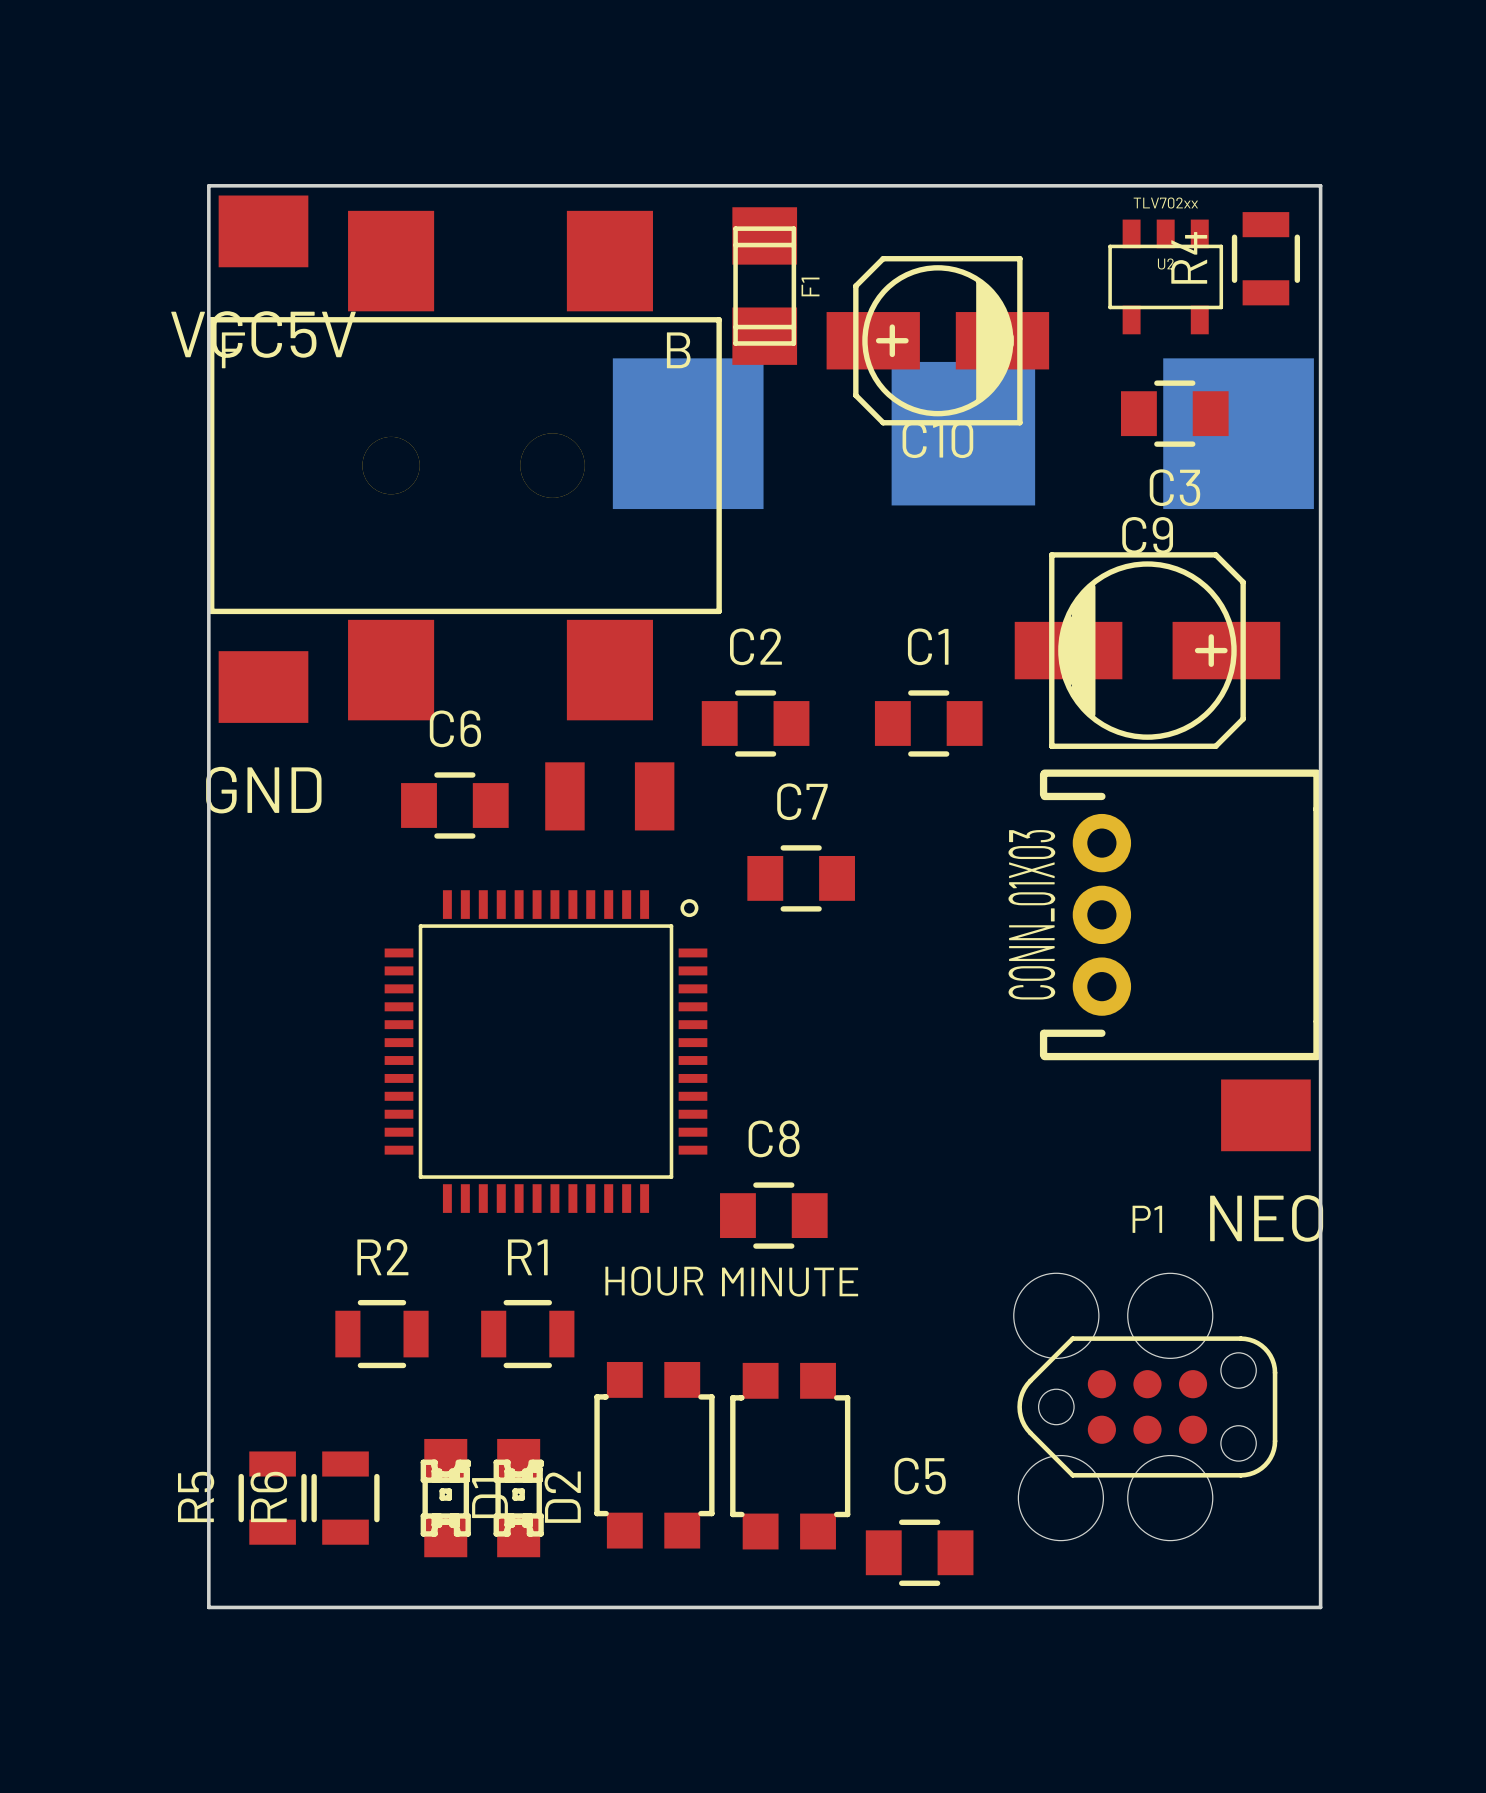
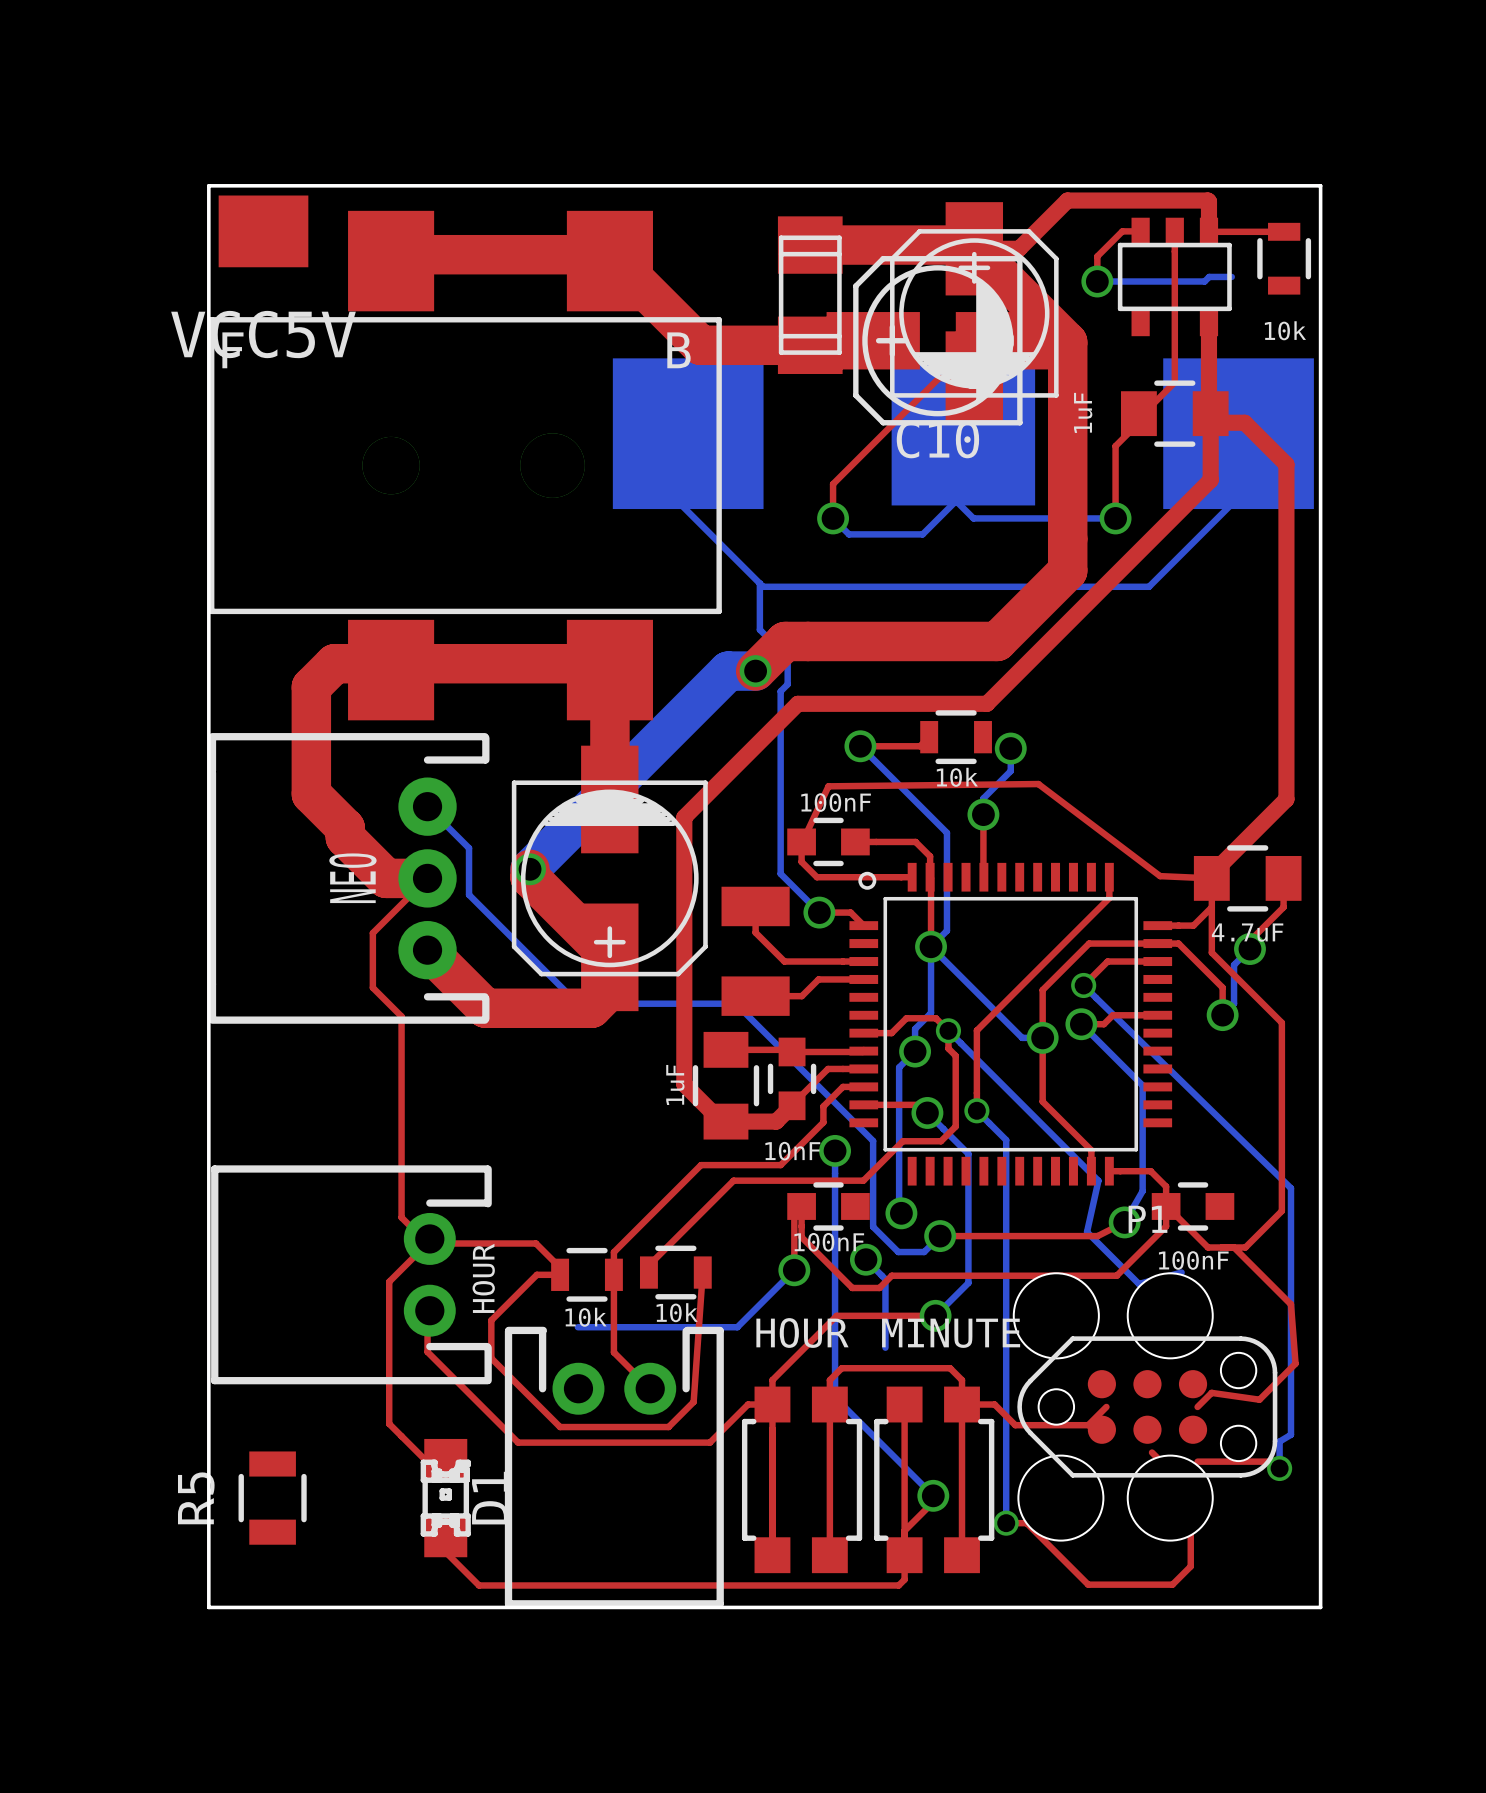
top track: none -> (1140, 231) (1122, 231) (1097, 256) (1097, 281)
top track: none -> (1174, 231) (1174, 382) (1138, 418) (1138, 422) (1115, 446) (1115, 518)
top track: none -> (1208, 231) (1207, 200) (1067, 200) (1019, 248) (974, 248)
top track: none -> (1209, 231) (1284, 231)
top track: none -> (810, 245) (970, 245) (1067, 342) (1067, 570) (997, 641) (785, 641) (755, 671)
top track: none -> (391, 254) (609, 254) (700, 345) (810, 345)
R4: (1265, 258) -> none
part: none -> 10k (1284, 258)
U2: TLV702xx (1165, 276) -> none
part: none -> (1174, 276)
bottom track: none -> (1231, 276) (1209, 276) (1204, 281) (1097, 281)
via: none -> (1097, 281)
F1: (764, 286) -> none
part: none -> (810, 295)
part: none -> (974, 313)
top track: none -> (1208, 322) (1208, 421) (1210, 422)
top track: none -> (974, 378) (939, 378) (833, 484) (833, 518)
C3 value: none -> 1uF (1083, 412)
bottom track: none -> (680, 422) (680, 504) (763, 586) (1149, 586) (1231, 504) (1231, 422)
top track: none -> (1210, 422) (1244, 422) (1286, 464) (1286, 799) (1211, 873) (1211, 878)
top track: none -> (1210, 422) (1210, 480) (986, 703) (797, 703) (684, 817) (684, 1084) (721, 1121) (776, 1121) (828, 1068) (863, 1068)
C3 name: C3 (1174, 487) -> none
bottom track: none -> (956, 500) (922, 534) (849, 534) (833, 518)
bottom track: none -> (956, 500) (973, 518) (1115, 518)
via: none -> (833, 518)
via: none -> (1115, 518)
bottom track: none -> (759, 583) (759, 629) (787, 657) (787, 684) (780, 691) (780, 873) (819, 912)
C9: (1147, 650) -> none
bottom track: none -> (755, 671) (728, 671) (530, 869)
via: none -> (755, 671)
part: GND (263, 687) -> none
C2: (755, 723) -> none
C1: (928, 723) -> none
top track: none -> (929, 737) (920, 746) (860, 746)
part: none -> 10k (956, 737)
bottom track: none -> (860, 746) (946, 832) (946, 930) (931, 946)
via: none -> (860, 746)
bottom track: none -> (1010, 748) (1010, 771) (983, 798) (983, 814)
via: none -> (1010, 748)
part rotation: 0° (609, 796) -> 90° clockwise (755, 951)
part position: (609, 796) -> (755, 951)
top track: none -> (609, 799) (609, 663) (334, 663) (311, 687) (311, 794) (345, 828) (345, 837) (386, 878) (427, 878) (372, 933) (372, 987) (401, 1016) (401, 1217) (427, 1243)
C6: (454, 805) -> none
bottom track: none -> (427, 806) (469, 848) (469, 894) (577, 1003) (735, 1003) (873, 1140) (873, 1226) (898, 1252) (924, 1252) (940, 1236)
top track: none -> (983, 814) (983, 876)
via: none -> (983, 814)
part: none -> 100nF (828, 841)
top track: none -> (855, 841) (915, 841) (930, 856) (931, 946)
top track: none -> (530, 869) (530, 877) (609, 957) (609, 990) (591, 1008) (485, 1008) (427, 950)
via: none -> (530, 869)
top track: none -> (912, 877) (816, 877) (801, 861) (801, 841) (828, 786) (1038, 784) (1160, 876) (1211, 878)
top track: none -> (1109, 877) (1109, 898) (976, 1030) (976, 1110)
part: none -> NEO (349, 878)
part: none -> (609, 878)
C7: (801, 878) -> none
top track: none -> (1211, 878) (1211, 952) (1281, 1022) (1281, 1211) (1245, 1247) (1208, 1247) (1166, 1206)
part: none -> 4.7uF (1247, 878)
top track: none -> (1283, 878) (1283, 907) (1249, 940) (1249, 949)
top track: none -> (755, 906) (755, 932) (784, 961) (863, 961)
top track: none -> (1211, 907) (1193, 925) (1157, 925)
top track: none -> (819, 912) (850, 912) (863, 925)
via: none -> (819, 912)
part: CONN_01X03 (1180, 914) -> none
bottom track: none -> (931, 946) (931, 1013) (915, 1029) (915, 1051) (899, 1067) (899, 1211) (901, 1213)
bottom track: none -> (931, 946) (1022, 1037) (1042, 1037)
via: none -> (931, 946)
bottom track: none -> (1249, 949) (1234, 964) (1234, 1003) (1222, 1015)
via: none -> (1249, 949)
top track: none -> (1157, 961) (1107, 961) (1083, 985)
top track: none -> (863, 979) (818, 979) (801, 996) (755, 996)
bottom track: none -> (1083, 985) (1290, 1188) (1290, 1434) (1279, 1441) (1279, 1468)
via: none -> (1083, 985)
top track: none -> (1157, 1015) (1112, 1015) (1103, 1024) (1081, 1024)
top track: none -> (1222, 1015) (1222, 987) (1178, 943) (1089, 943) (1042, 990) (1042, 1101) (1091, 1150) (1091, 1171)
via: none -> (1222, 1015)
bottom track: none -> (1081, 1024) (1142, 1085) (1142, 1191) (1124, 1222)
via: none -> (1081, 1024)
bottom track: none -> (948, 1030) (1098, 1180) (1087, 1232) (1138, 1283) (1181, 1272)
via: none -> (948, 1030)
top track: none -> (863, 1033) (891, 1033) (906, 1018) (935, 1018) (948, 1030) (948, 1048) (955, 1055) (955, 1126) (941, 1141) (902, 1141) (863, 1180) (733, 1180) (648, 1265) (648, 1272)
via: none -> (1042, 1037)
top track: none -> (725, 1049) (789, 1049) (792, 1051) (862, 1051) (863, 1049)
part rotation: 0° (546, 1051) -> 90° counterclockwise (1010, 1024)
part position: (546, 1051) -> (1010, 1024)
via: none -> (915, 1051)
part: none -> 10nF (792, 1078)
part: none -> 1uF (725, 1085)
top track: none -> (863, 1086) (842, 1086) (823, 1106) (823, 1122) (780, 1165) (701, 1165) (613, 1252) (613, 1352) (650, 1388)
top track: none -> (863, 1104) (919, 1104) (927, 1112)
bottom track: none -> (976, 1110) (1006, 1140) (1006, 1523)
via: none -> (976, 1110)
bottom track: none -> (927, 1112) (968, 1153) (968, 1282) (935, 1315)
via: none -> (927, 1112)
part: NEO (1265, 1115) -> none
bottom track: none -> (835, 1150) (835, 1397) (933, 1495)
via: none -> (835, 1150)
top track: none -> (1109, 1171) (1150, 1171) (1166, 1186) (1166, 1226) (1116, 1275) (891, 1275) (879, 1288) (852, 1288) (801, 1237) (801, 1206) (794, 1213) (794, 1270)
part: none -> 100nF (828, 1206)
part: none -> 100nF (1193, 1206)
via: none -> (901, 1213)
C8: (773, 1215) -> none
top track: none -> (1124, 1222) (1097, 1236) (940, 1236)
via: none -> (1124, 1222)
via: none -> (940, 1236)
top track: none -> (427, 1243) (535, 1243) (560, 1267) (560, 1274) (536, 1274) (491, 1320) (491, 1358) (560, 1427) (668, 1427) (693, 1402) (702, 1272)
top track: none -> (427, 1243) (389, 1281) (389, 1423) (427, 1462)
top track: none -> (1234, 1247) (1290, 1304) (1295, 1363) (1259, 1399) (1211, 1392) (1197, 1406)
bottom track: none -> (865, 1259) (885, 1279) (885, 1347)
via: none -> (865, 1259)
bottom track: none -> (794, 1270) (737, 1327) (577, 1327)
via: none -> (794, 1270)
part: none -> 10k (675, 1272)
part: none -> HOUR (351, 1274)
part: none -> 10k (587, 1274)
part value: MINUTE (790, 1282) -> HOUR (802, 1333)
top track: none -> (427, 1315) (427, 1351) (518, 1442) (709, 1442) (748, 1404) (772, 1404)
top track: none -> (935, 1315) (836, 1315) (772, 1380) (772, 1555)
via: none -> (935, 1315)
R2: (381, 1334) -> none
R1: (527, 1334) -> none
top track: none -> (904, 1404) (904, 1579) (898, 1585) (479, 1585) (427, 1533)
top track: none -> (962, 1404) (994, 1404) (1015, 1425) (1088, 1425) (1106, 1406)
top track: none -> (1152, 1452) (1190, 1491) (1190, 1566) (1172, 1584) (1088, 1584) (1026, 1523) (1006, 1523)
part: HOUR (654, 1455) -> none
part position: (790, 1456) -> (802, 1479)
top track: none -> (1197, 1461) (1272, 1461)
part: none -> (614, 1467)
via: none -> (1279, 1468)
part: none -> MINUTE (934, 1479)
top track: none -> (933, 1495) (933, 1502) (904, 1530)
via: none -> (933, 1495)
R6: (345, 1498) -> none
D2: (518, 1498) -> none
via: none -> (1006, 1523)
C5: (919, 1552) -> none
top track: none -> (829, 1555) (829, 1380) (841, 1368) (950, 1368) (962, 1380) (962, 1555)

